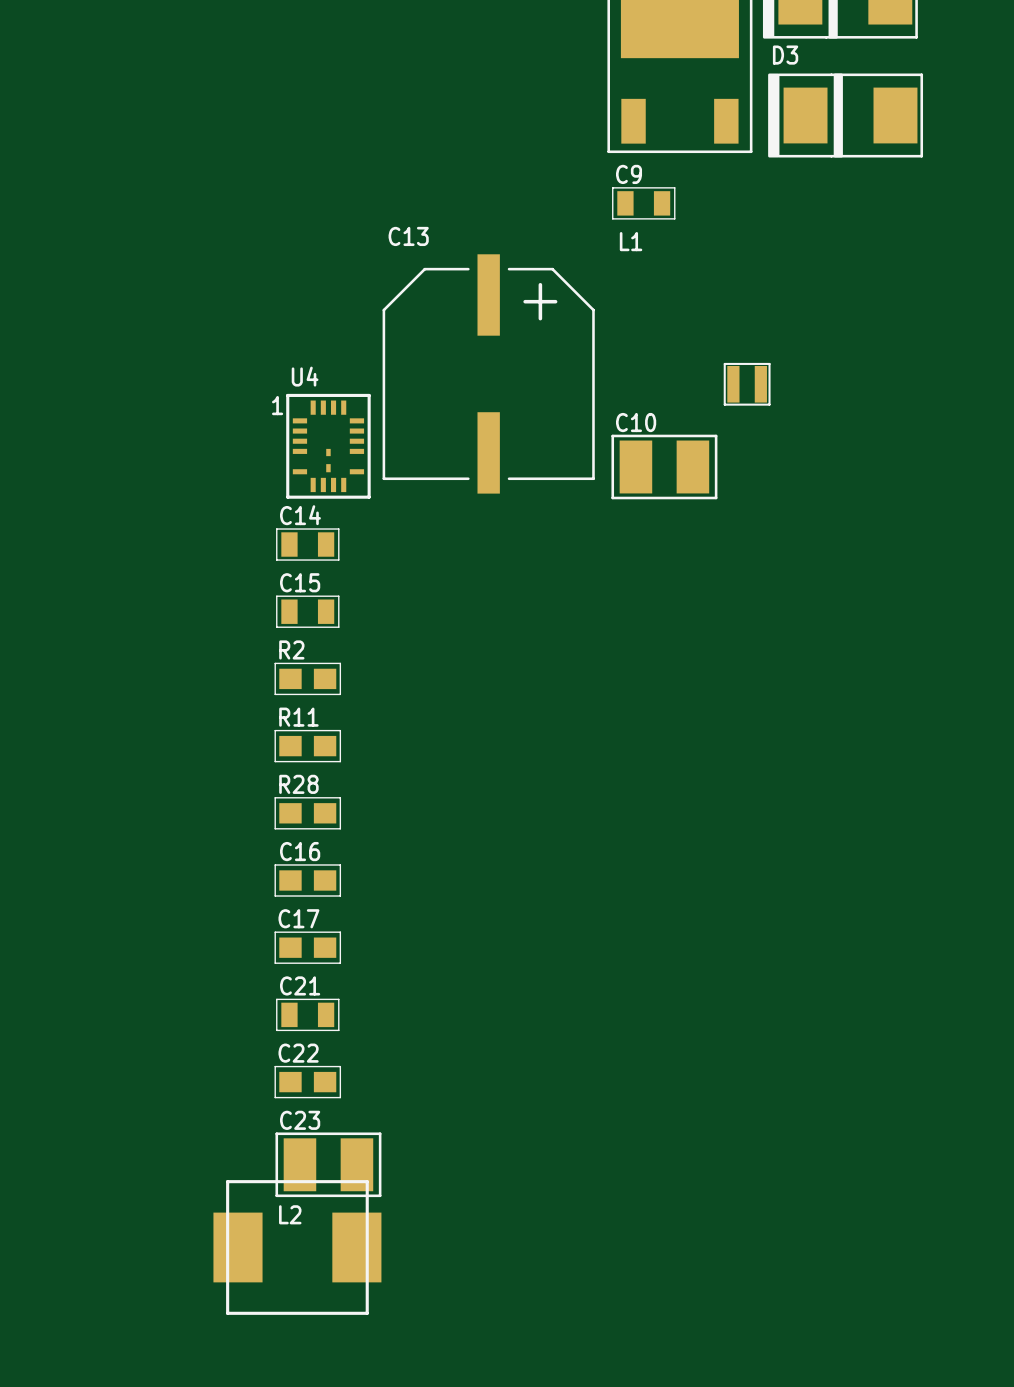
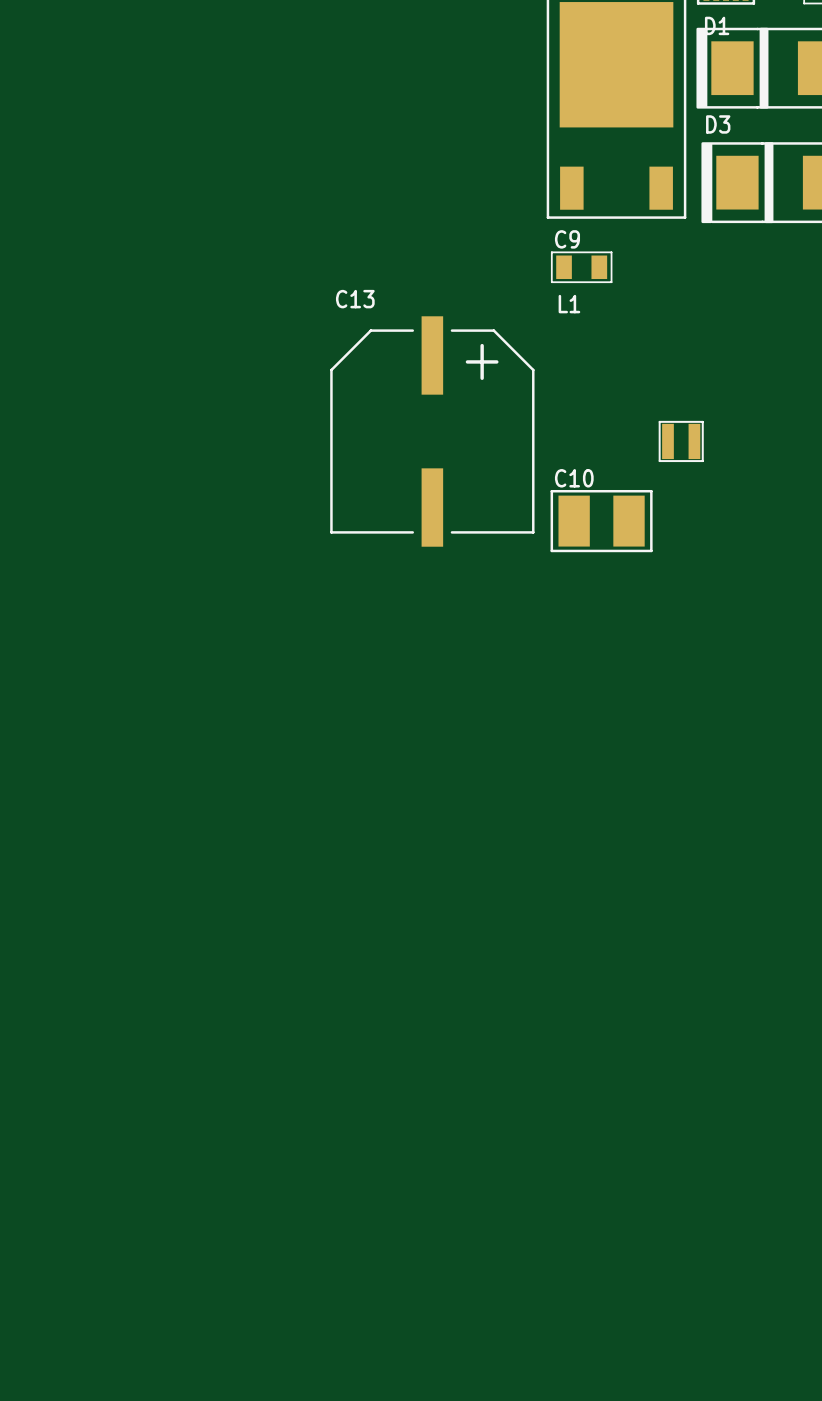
U4: (328, 446) -> none
C14: (307, 544) -> none
C15: (307, 611) -> none
R2: (307, 678) -> none
R11: (307, 746) -> none
R28: (307, 813) -> none
C16: (307, 880) -> none
C17: (307, 947) -> none
C21: (307, 1014) -> none
C22: (307, 1082) -> none
C23: (328, 1164) -> none
L2: (297, 1247) -> none

